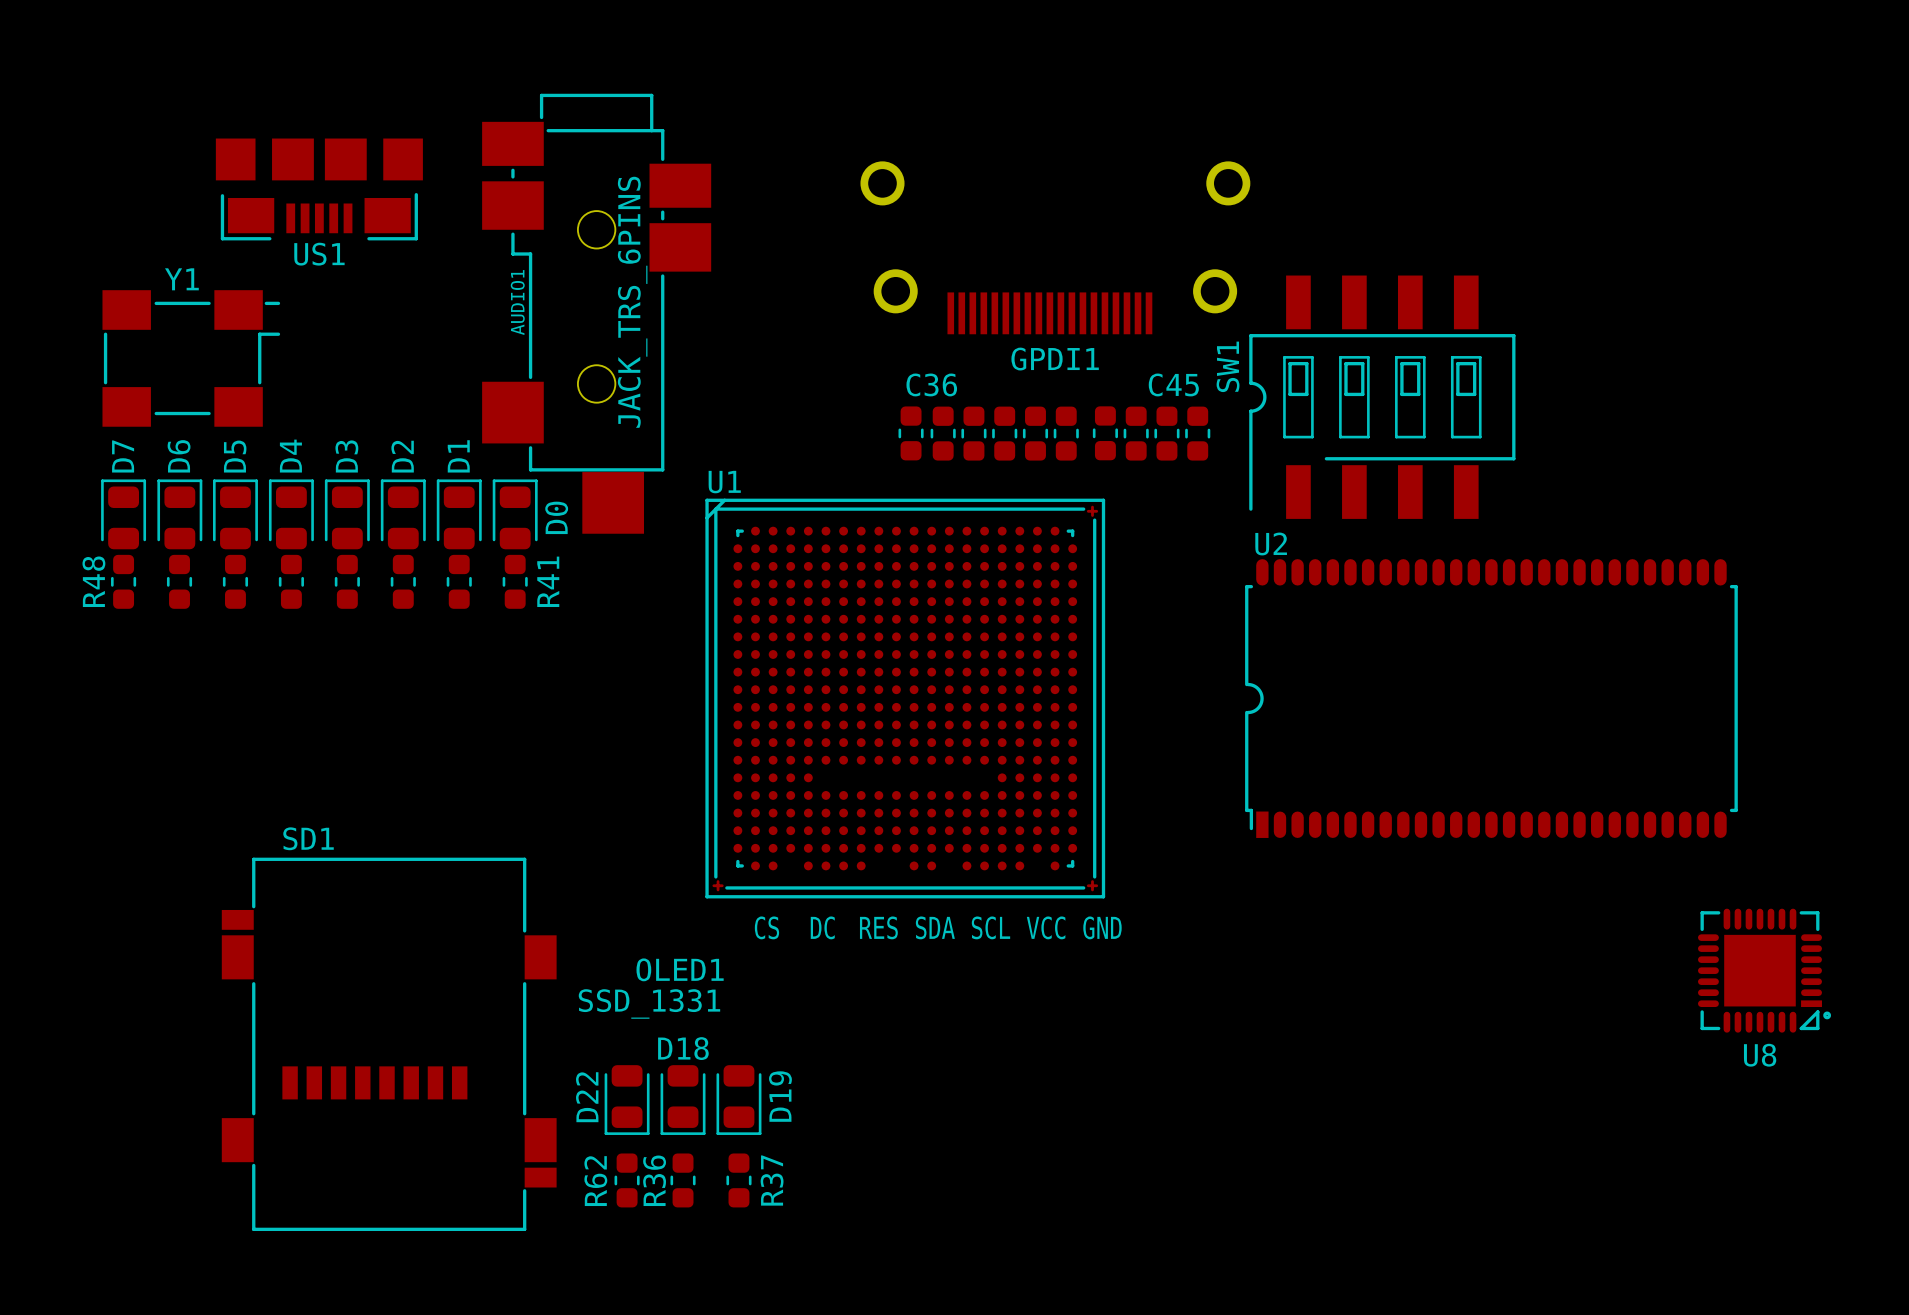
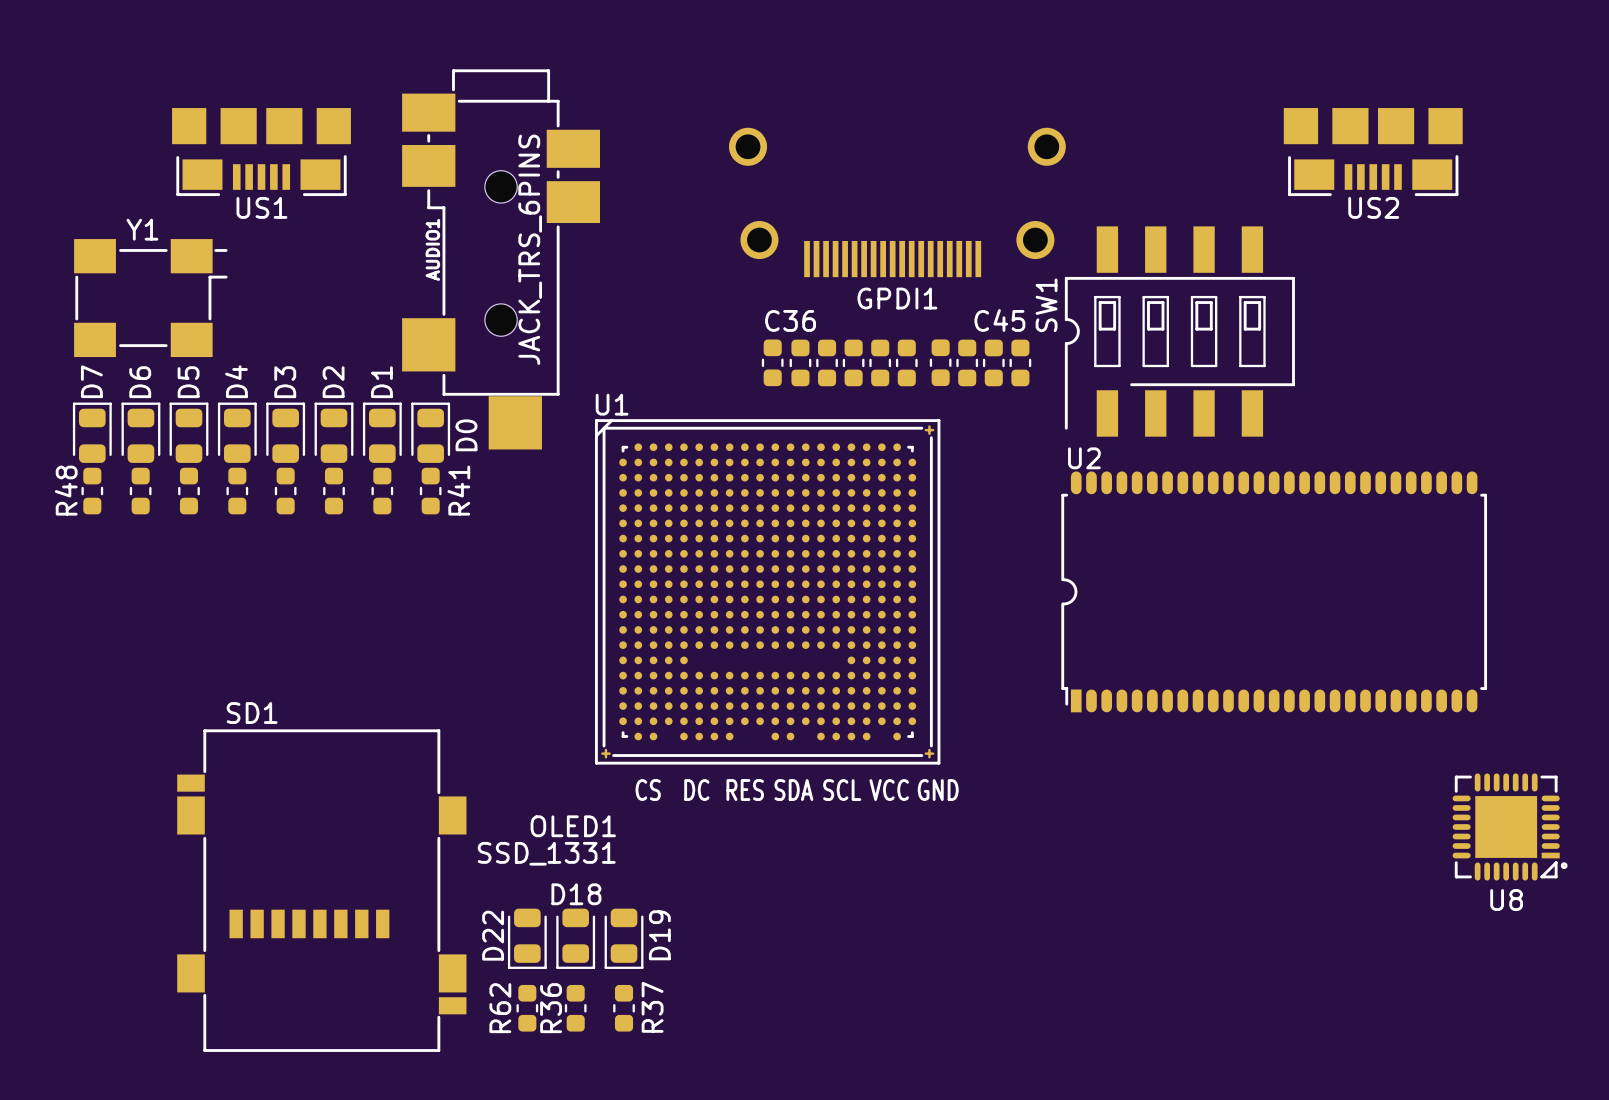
US2: none -> (1373, 152)

